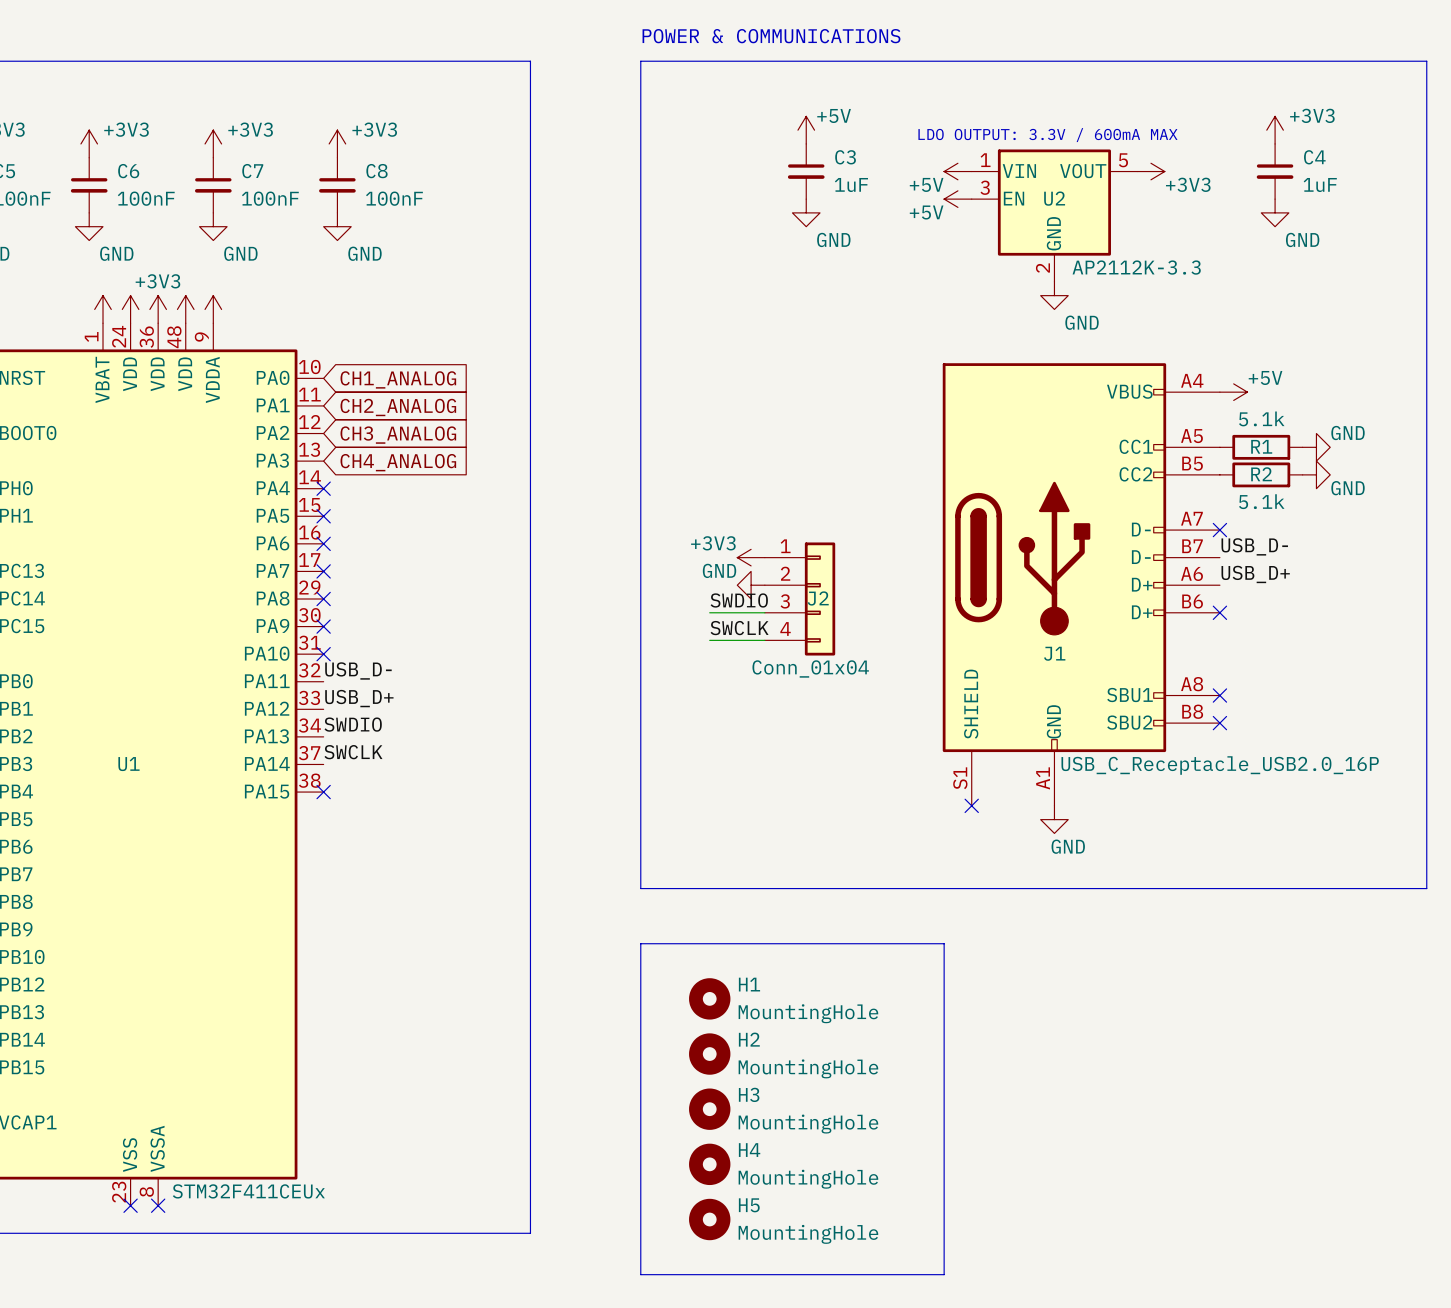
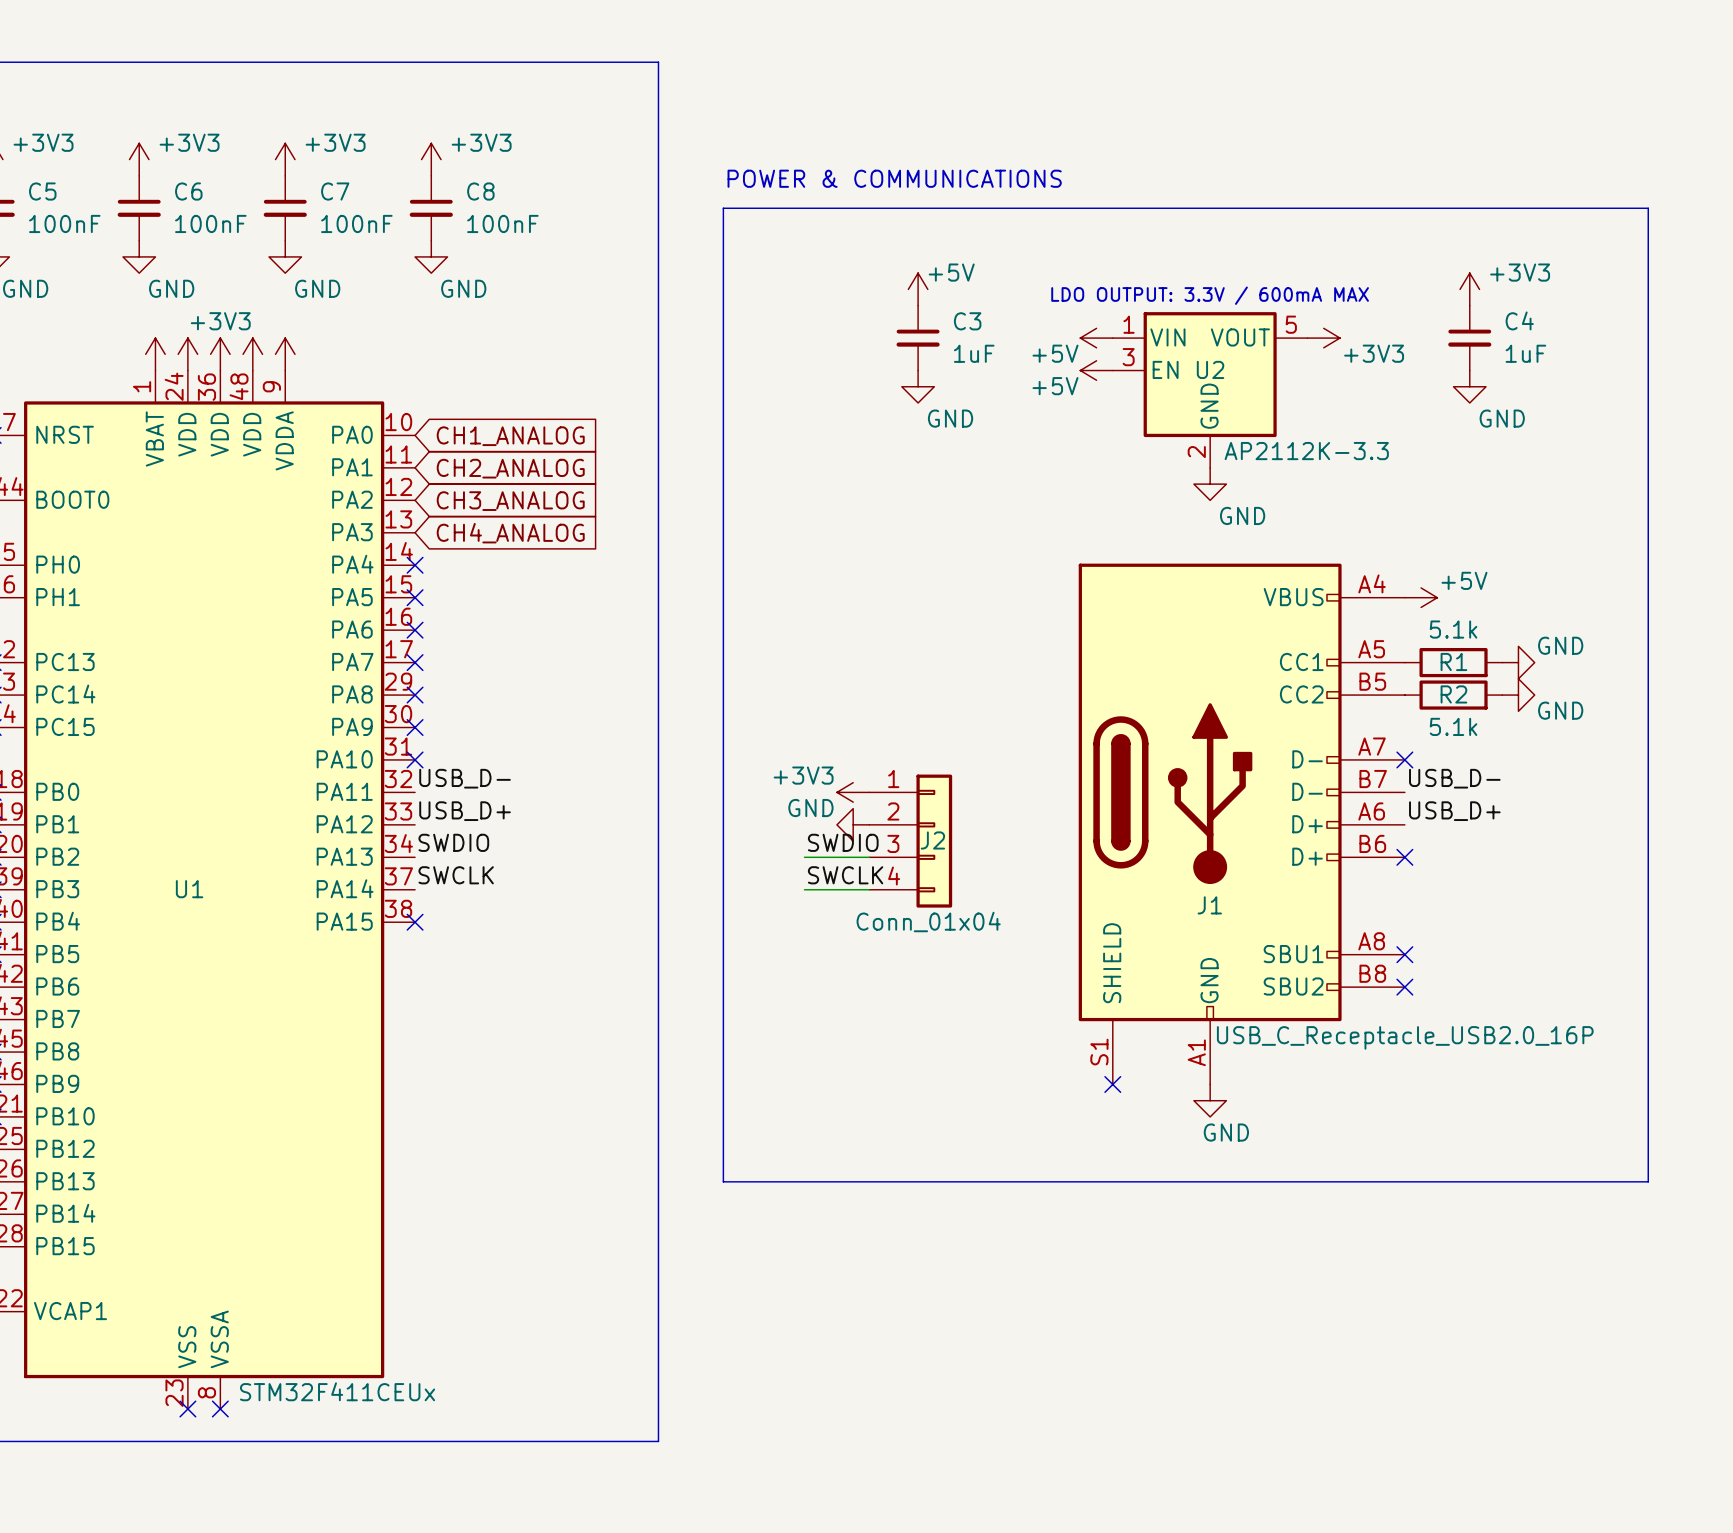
text position: POWER & COMMUNICATIONS (771, 36) -> POWER & COMMUNICATIONS (894, 178)
line: (640, 61) (1426, 61) (1426, 888) (640, 888) (640, 61) -> (723, 208) (1648, 208) (1648, 1181) (723, 1181) (723, 208)
power symbol: +5V (806, 130) -> none
power symbol: +3V3 (1275, 130) -> none
text position: LDO OUTPUT: 3.3V / 600mA MAX (1047, 135) -> LDO OUTPUT: 3.3V / 600mA MAX (1210, 295)
C3 position: (806, 171) -> (918, 338)
power symbol: +5V (957, 171) -> none
power symbol: +3V3 (1150, 171) -> none
C4 position: (1275, 171) -> (1469, 338)
power symbol: +5V (957, 199) -> none
power symbol: GND (806, 212) -> none
power symbol: GND (1275, 212) -> none
U2 position: (1054, 215) -> (1210, 390)
power symbol: none -> +5V (918, 289)
power symbol: none -> +3V3 (1469, 289)
power symbol: none -> +5V (1096, 338)
power symbol: GND (1054, 295) -> none
power symbol: none -> +3V3 (1323, 338)
power symbol: none -> +5V (1096, 370)
power symbol: none -> GND (918, 386)
power symbol: none -> GND (1469, 386)
power symbol position: +5V (1233, 392) -> +5V (1421, 597)
power symbol: none -> GND (1210, 484)
R1 position: (1261, 447) -> (1453, 662)
power symbol: GND (1316, 447) -> none
R2 position: (1261, 474) -> (1453, 695)
power symbol: GND (1316, 474) -> none
no-connect mark: (1219, 530) -> none
label position: USB_D- (1254, 546) -> USB_D- (1454, 778)
power symbol position: +3V3 (751, 557) -> +3V3 (853, 792)
power symbol: none -> GND (1518, 662)
label position: USB_D+ (1255, 574) -> USB_D+ (1454, 811)
J1 position: (1081, 584) -> (1241, 824)
power symbol: GND (751, 585) -> none
J2 position: (800, 599) -> (910, 841)
power symbol: none -> GND (1518, 695)
label position: SWDIO (739, 600) -> SWDIO (843, 842)
wire: (709, 612) (764, 612) -> (804, 857) (869, 857)
no-connect mark: (1219, 612) -> none
label position: SWCLK (739, 628) -> SWCLK (845, 875)
wire: (709, 640) (764, 640) -> (804, 889) (869, 889)
no-connect mark: none -> (1404, 759)
no-connect mark: (1219, 695) -> none
power symbol: none -> GND (853, 824)
no-connect mark: (1219, 723) -> none
no-connect mark: none -> (1404, 857)
no-connect mark: (971, 805) -> none
power symbol position: GND (1054, 819) -> GND (1210, 1100)
no-connect mark: none -> (1404, 954)
no-connect mark: none -> (1404, 987)
no-connect mark: none -> (1112, 1084)
line: (640, 943) (640, 1274) (944, 1274) (944, 943) (640, 943) -> none
H1: MountingHole (709, 998) -> none
H2: MountingHole (709, 1054) -> none
H3: MountingHole (709, 1109) -> none
H4: MountingHole (709, 1164) -> none
H5: MountingHole (709, 1219) -> none

